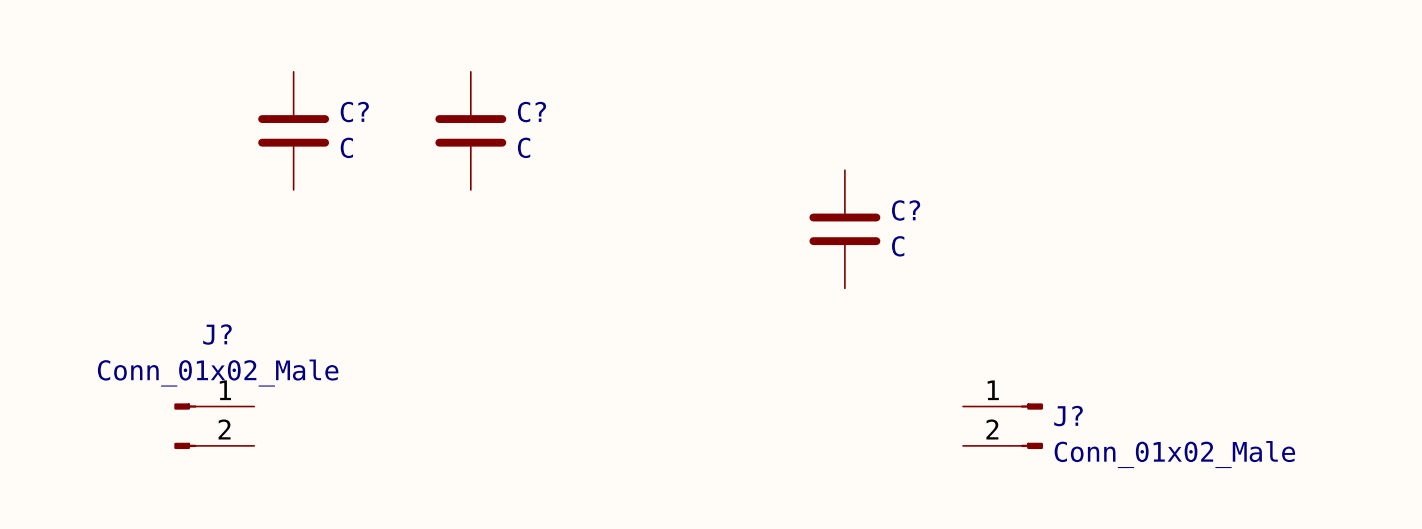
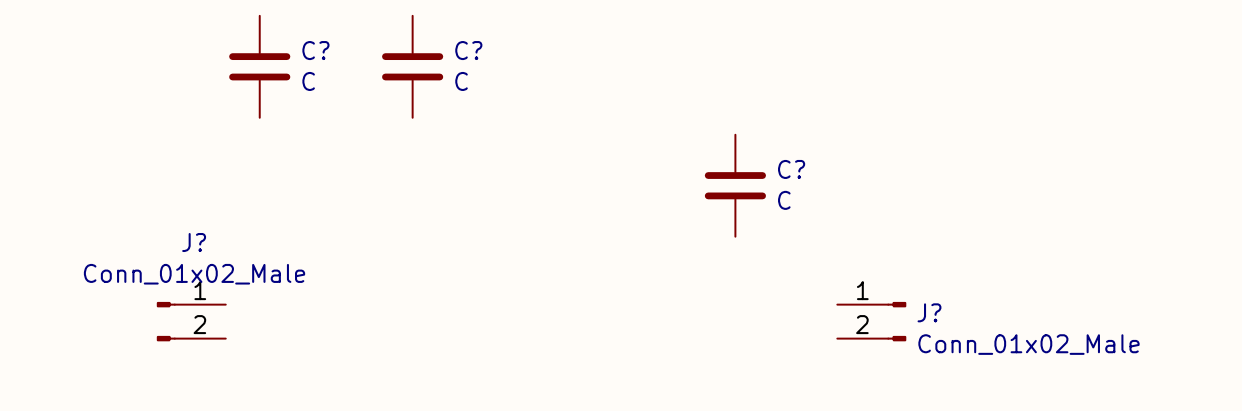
C? position: (844, 229) -> (735, 185)

